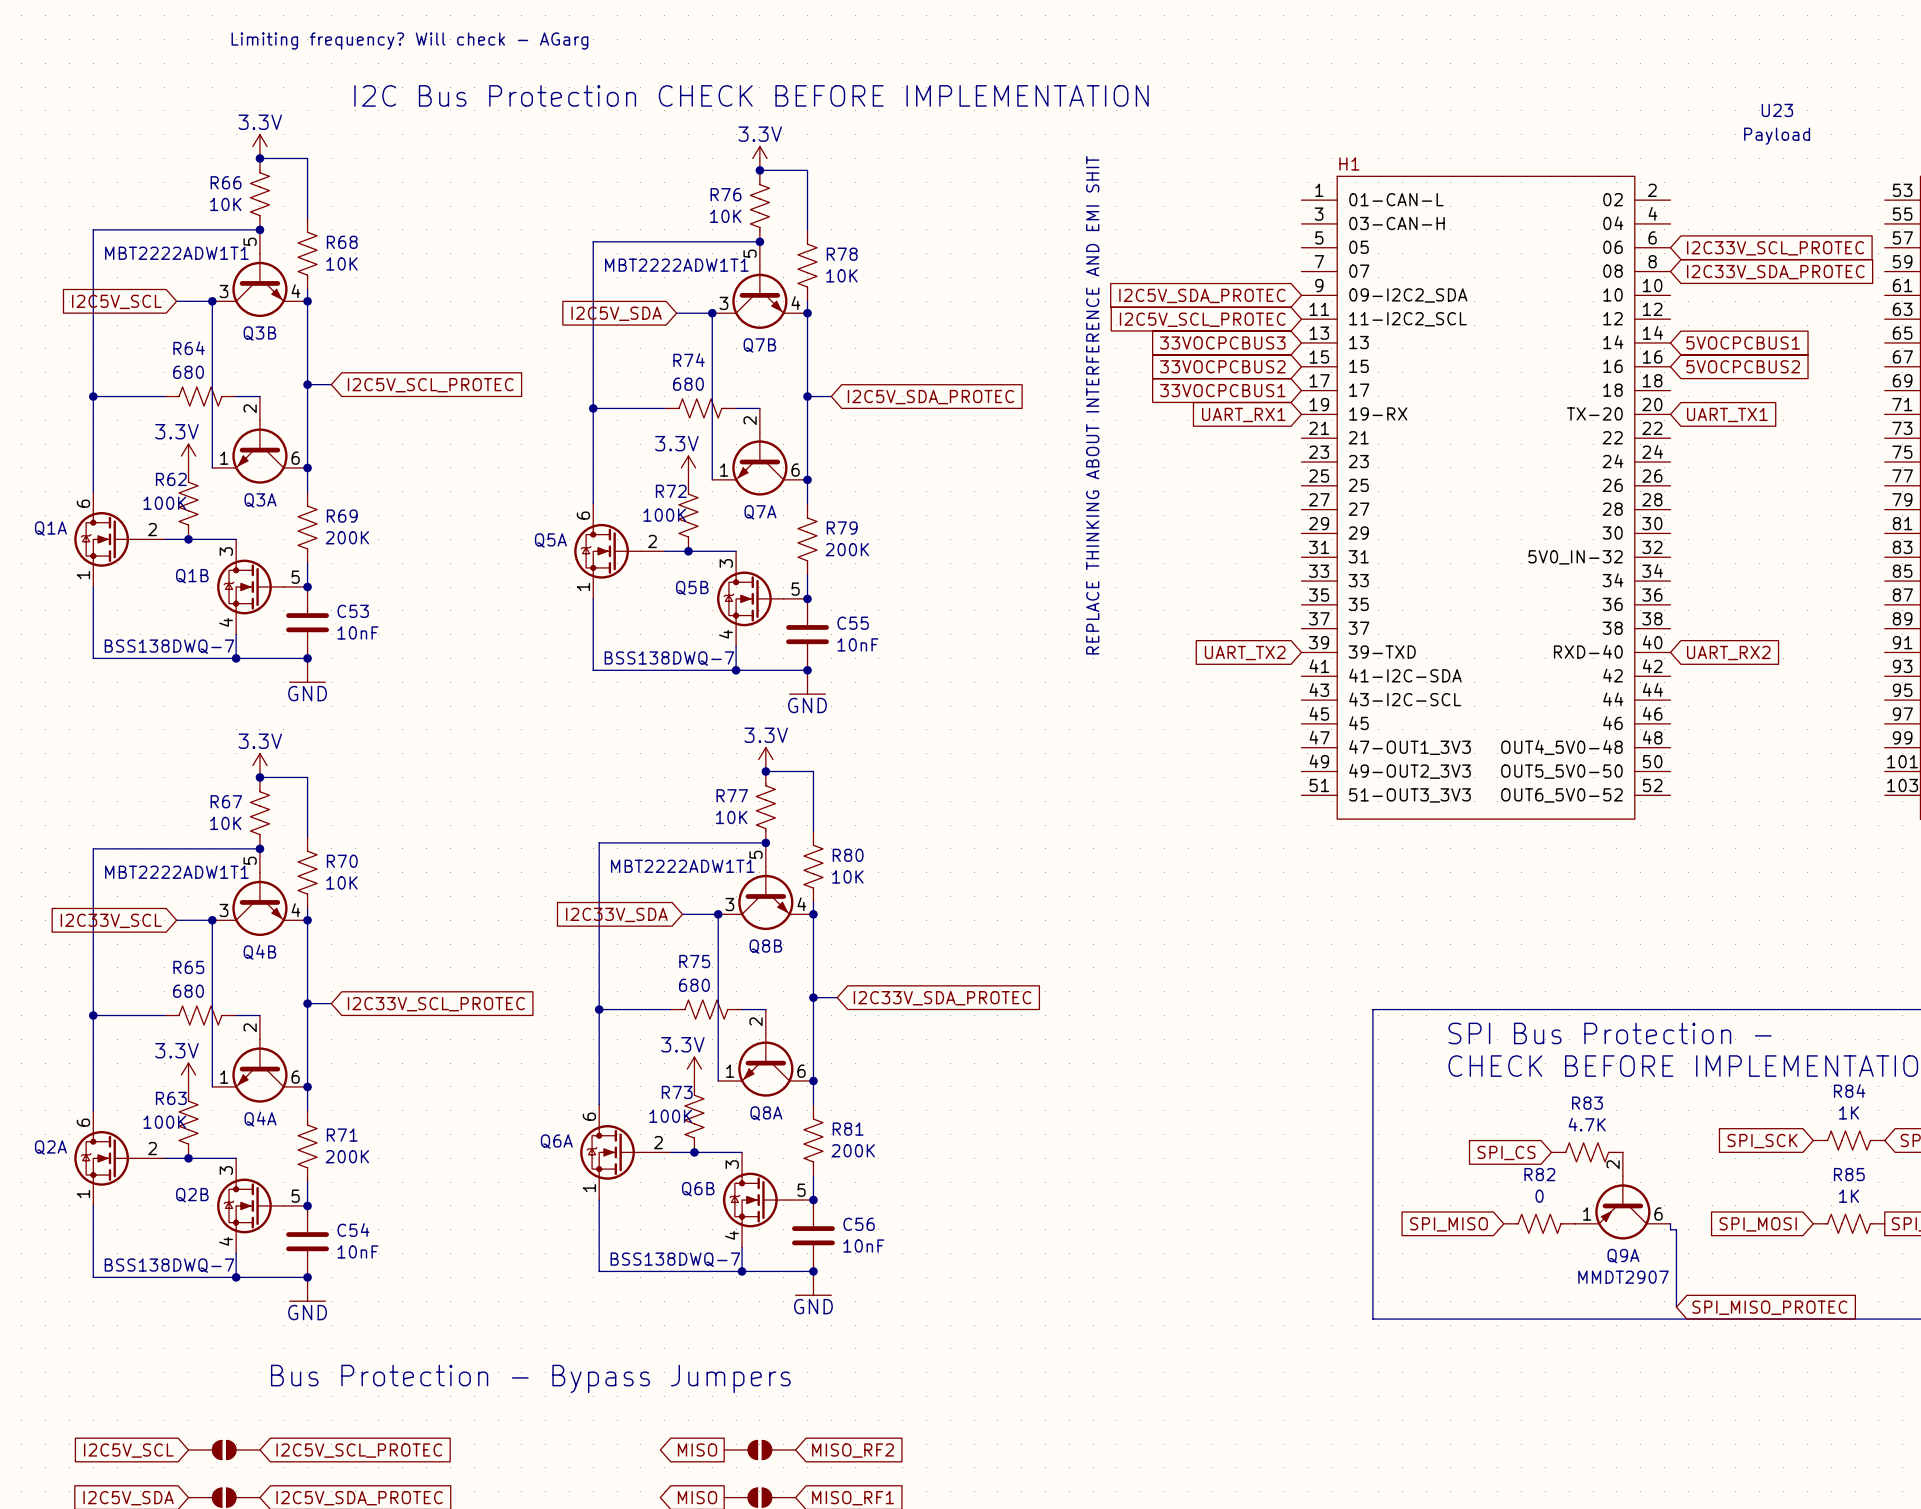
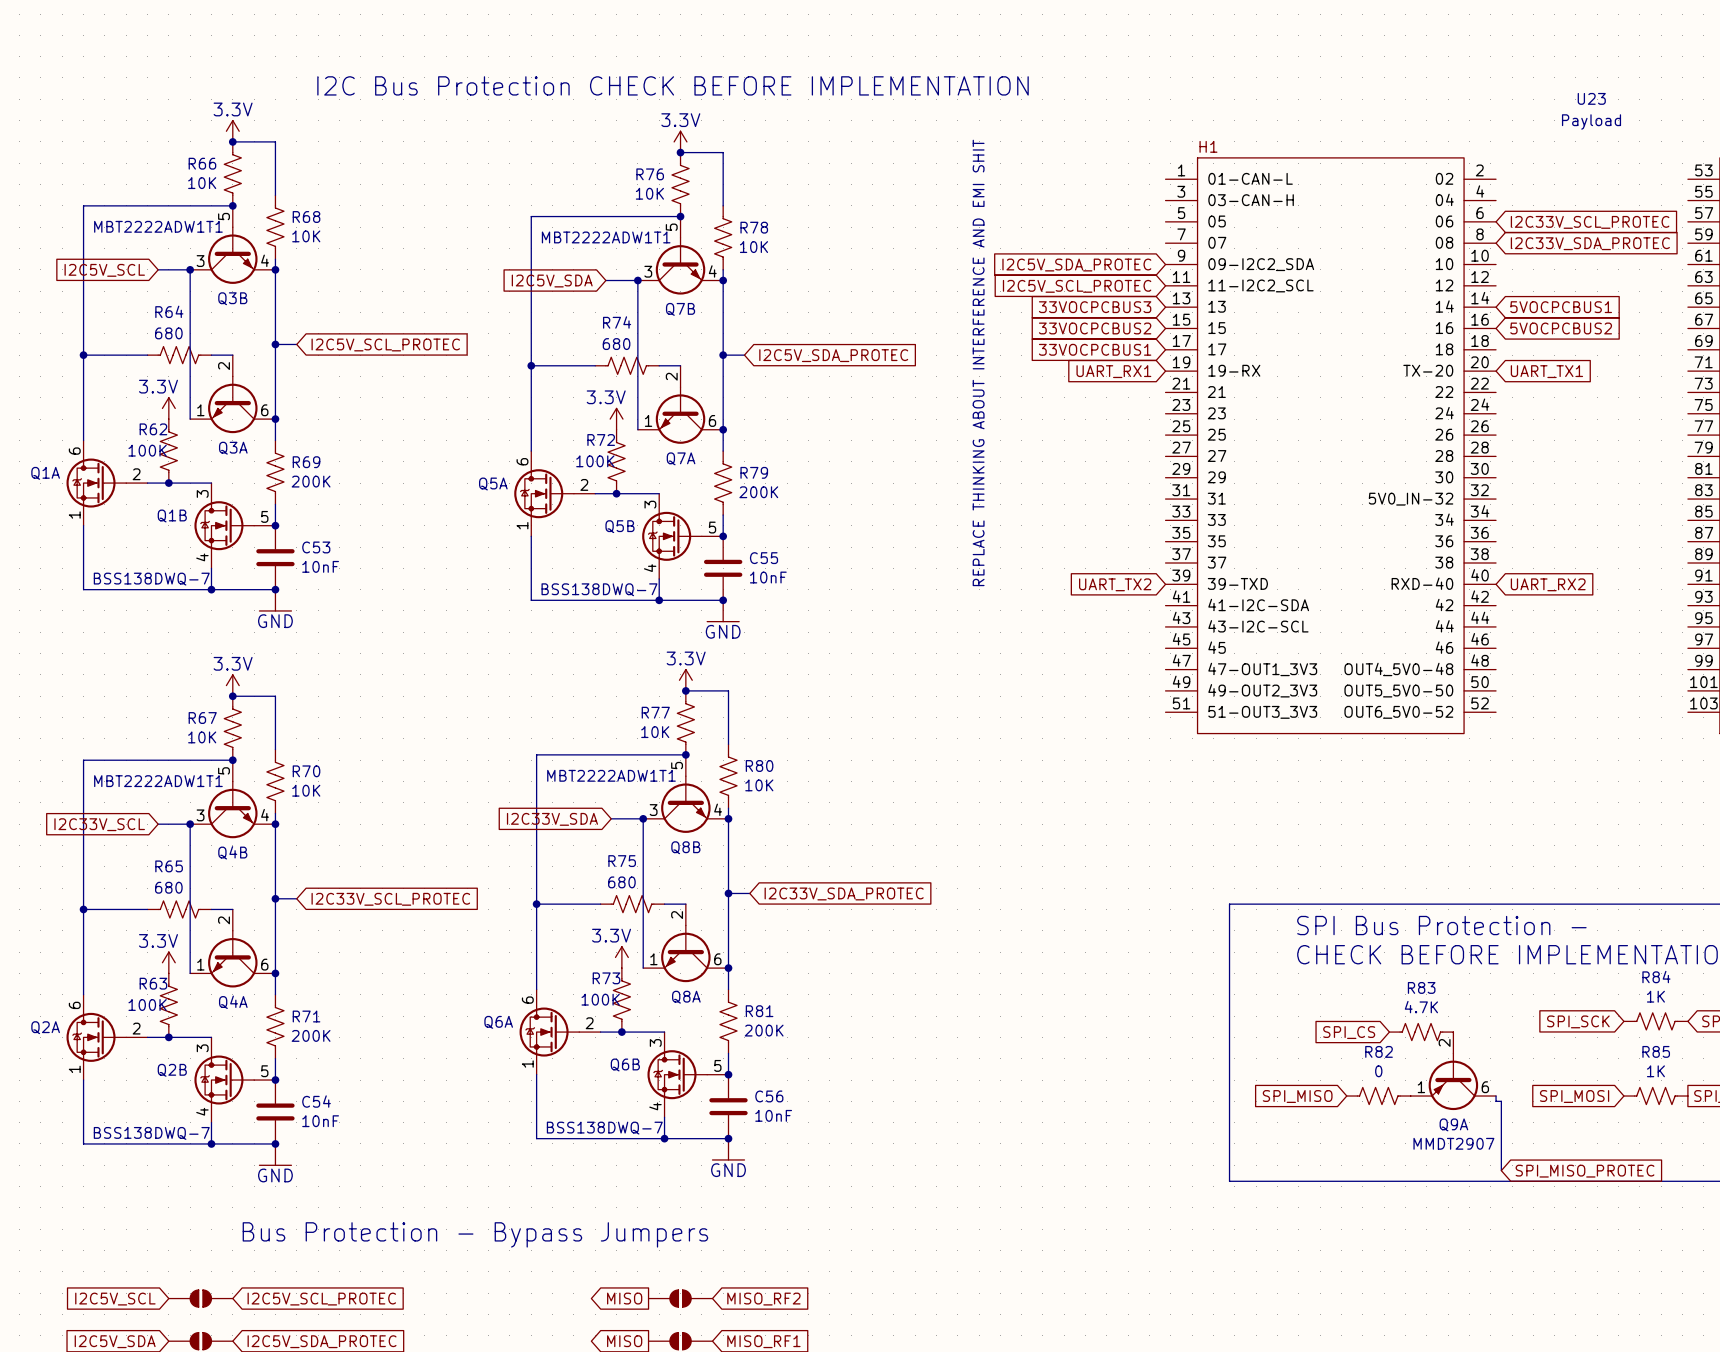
text: Limiting frequency? Will check - AGarg (409, 41) -> none

